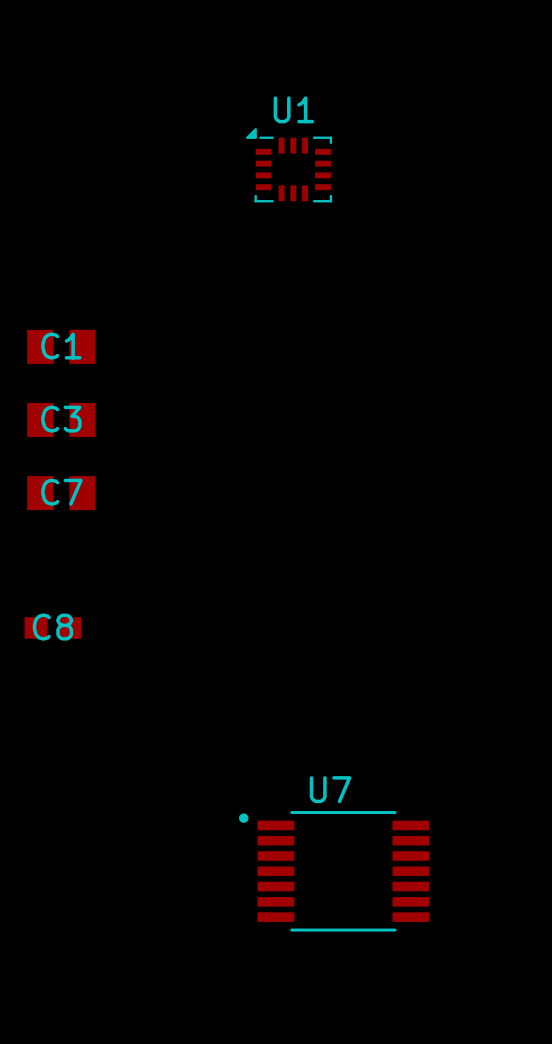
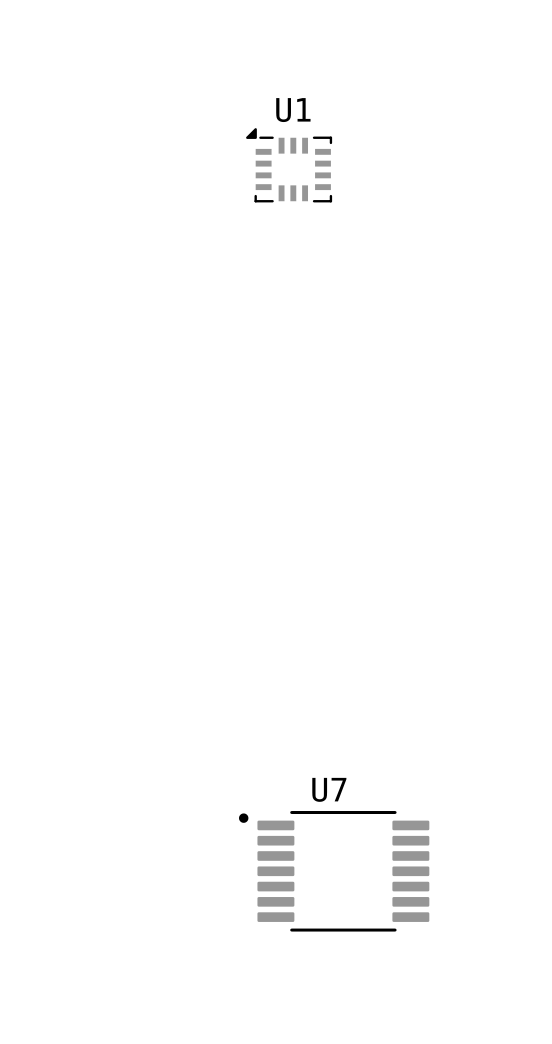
C1: (61, 346) -> none
C3: (61, 419) -> none
C7: (61, 493) -> none
C8: (52, 627) -> none

